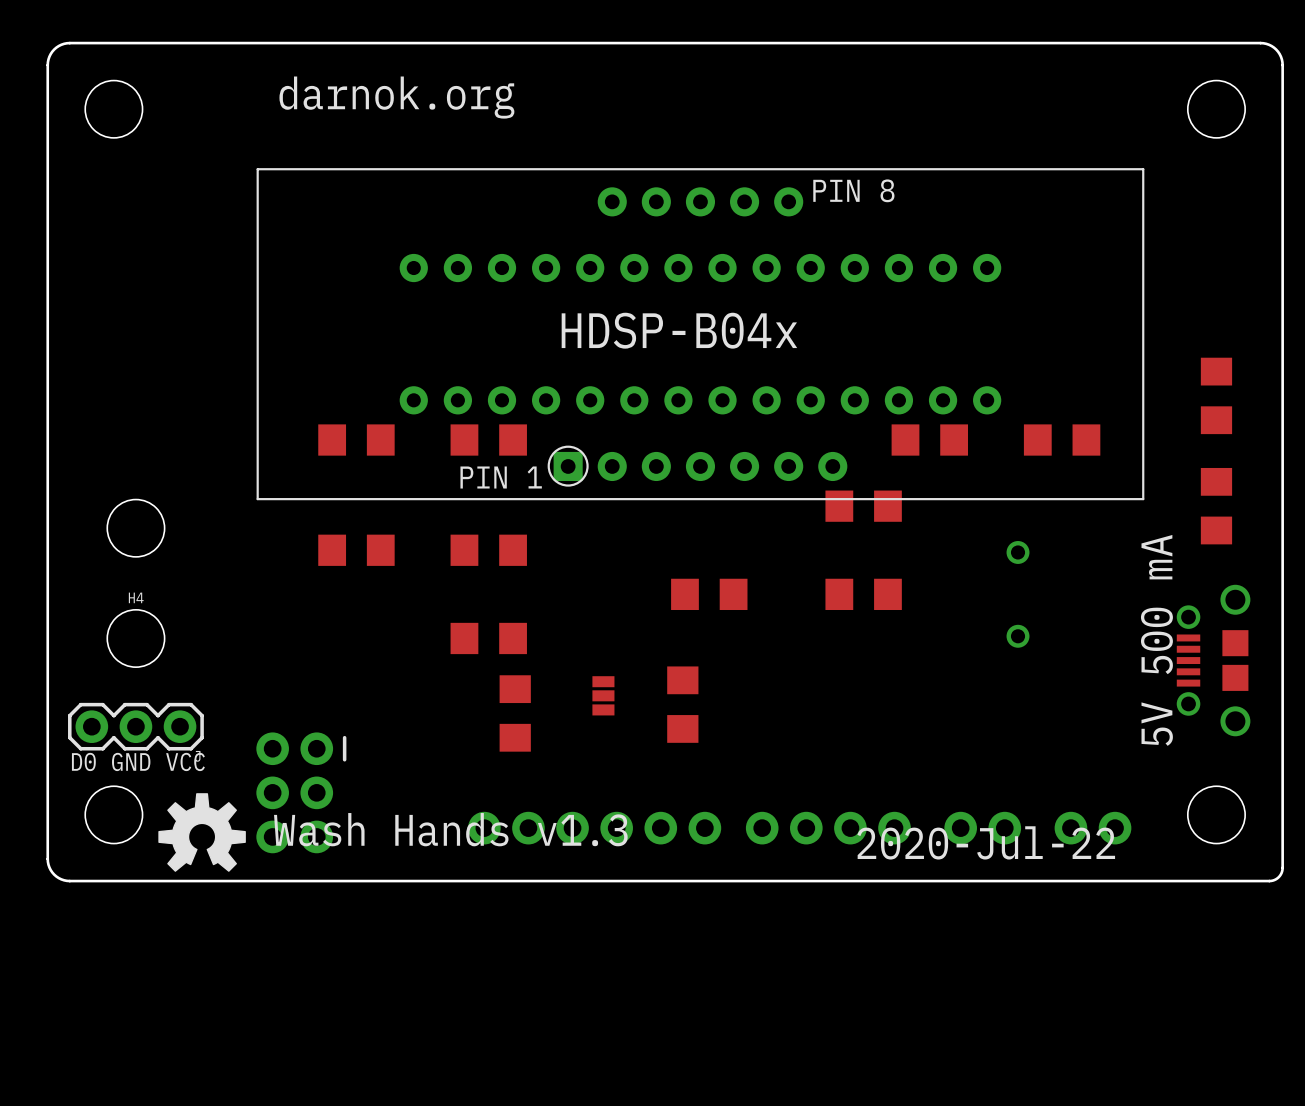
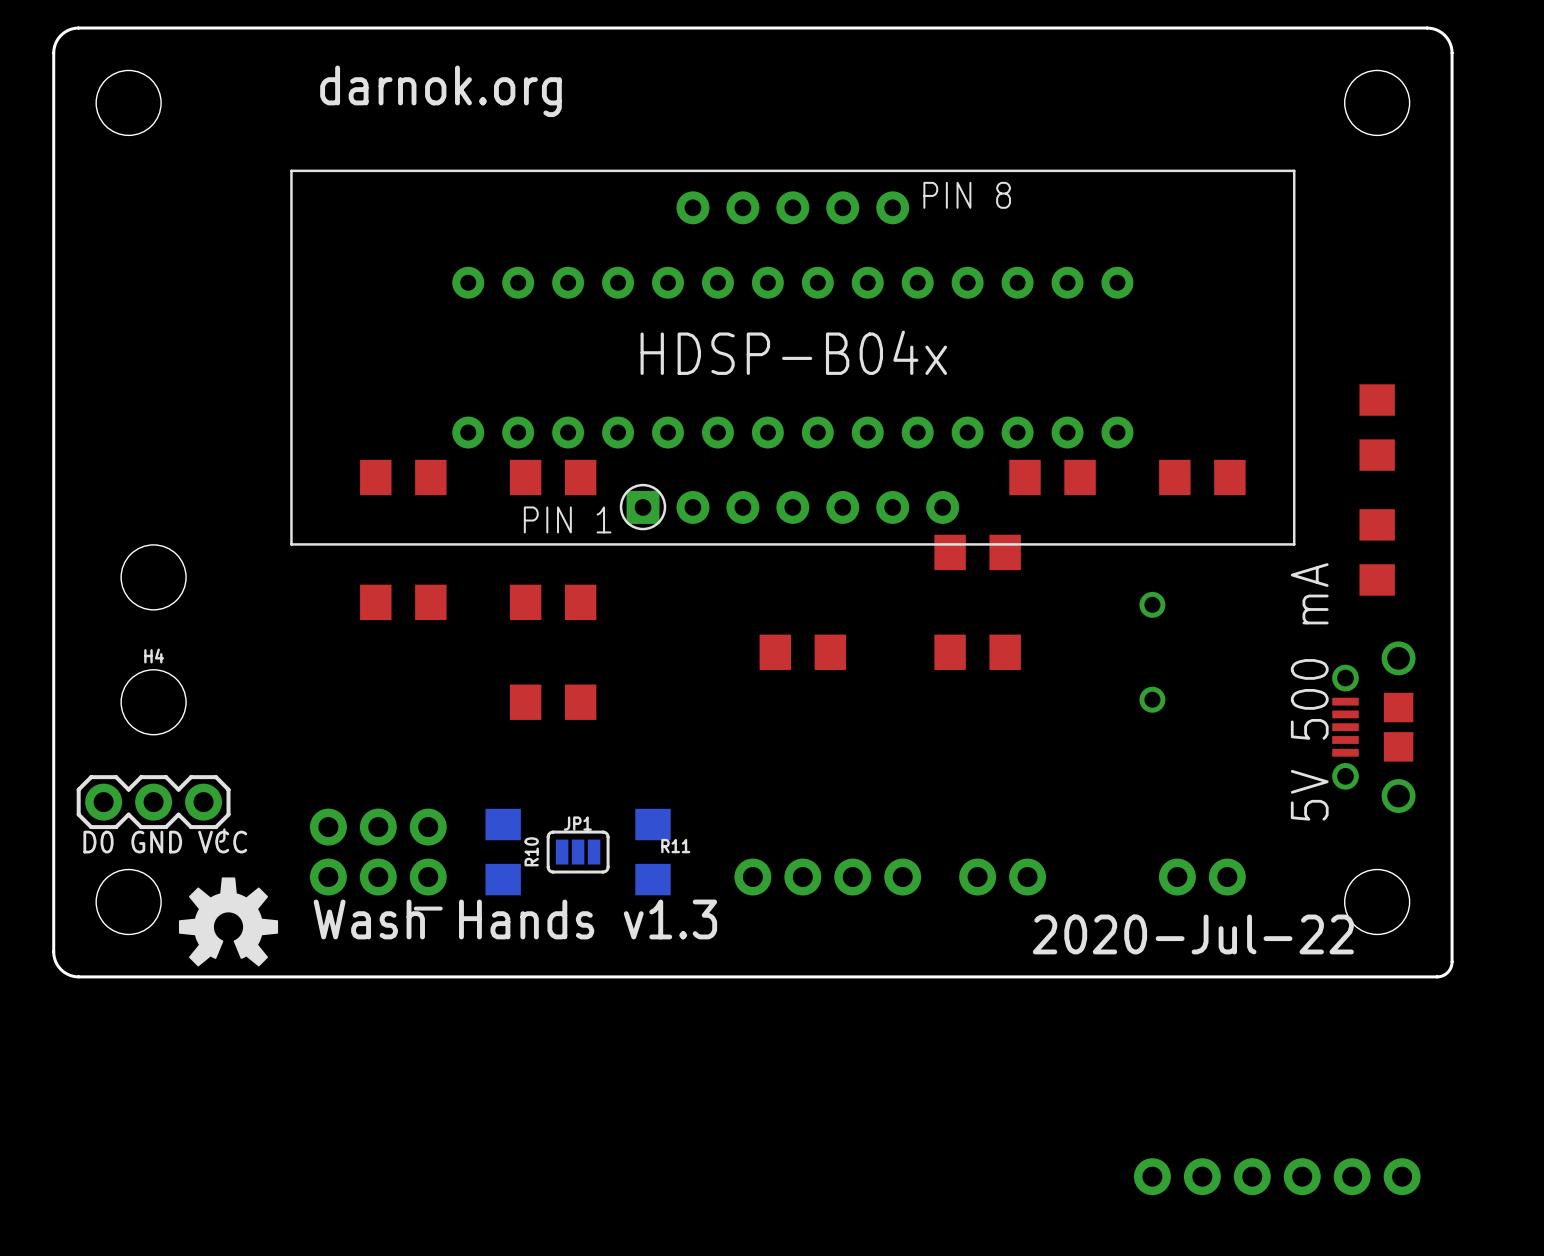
JP1 side: top (603, 695) -> bottom (578, 852)
R11 side: top (682, 704) -> bottom (653, 852)
R10 side: top (515, 713) -> bottom (503, 852)
part rotation: 0° (301, 792) -> 90° clockwise (378, 859)
part: none -> (1002, 877)
part: none -> (1202, 877)
part: (594, 828) -> none
part position: (828, 828) -> (827, 877)
part: (982, 828) -> none
part: (1092, 828) -> none
text position: 2020-Jul-22 (986, 842) -> 2020-Jul-22 (1193, 934)
part: none -> (1277, 1176)

